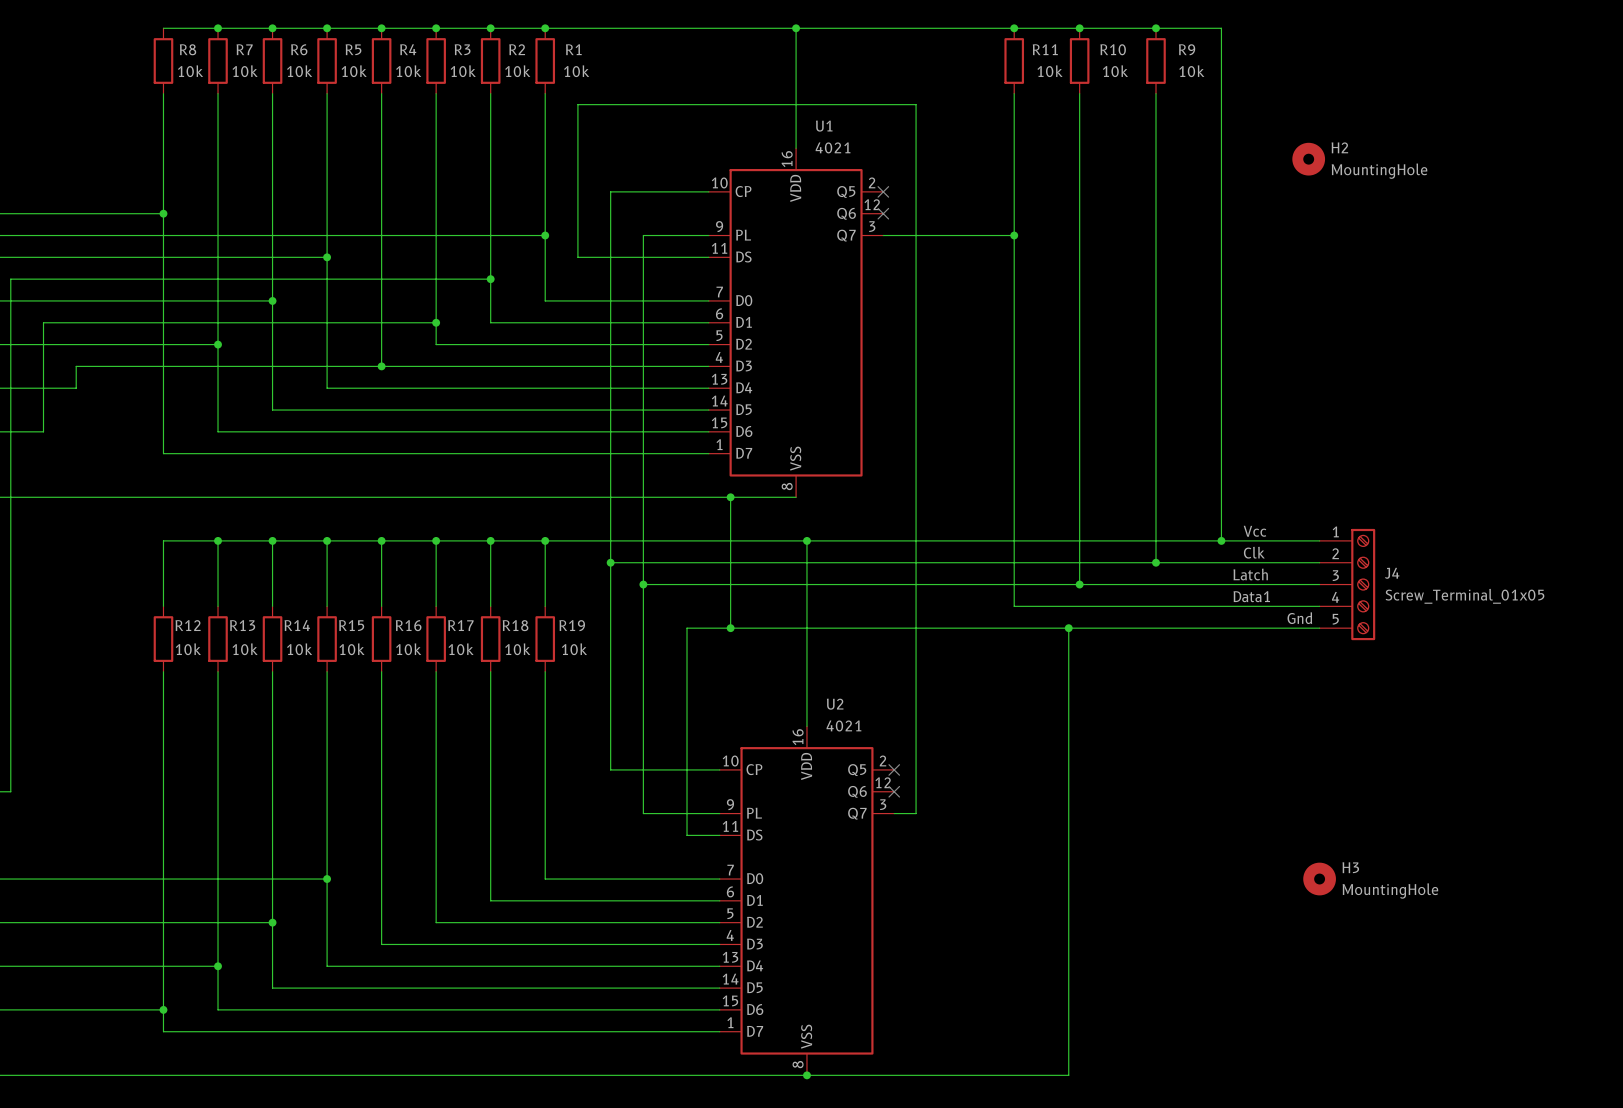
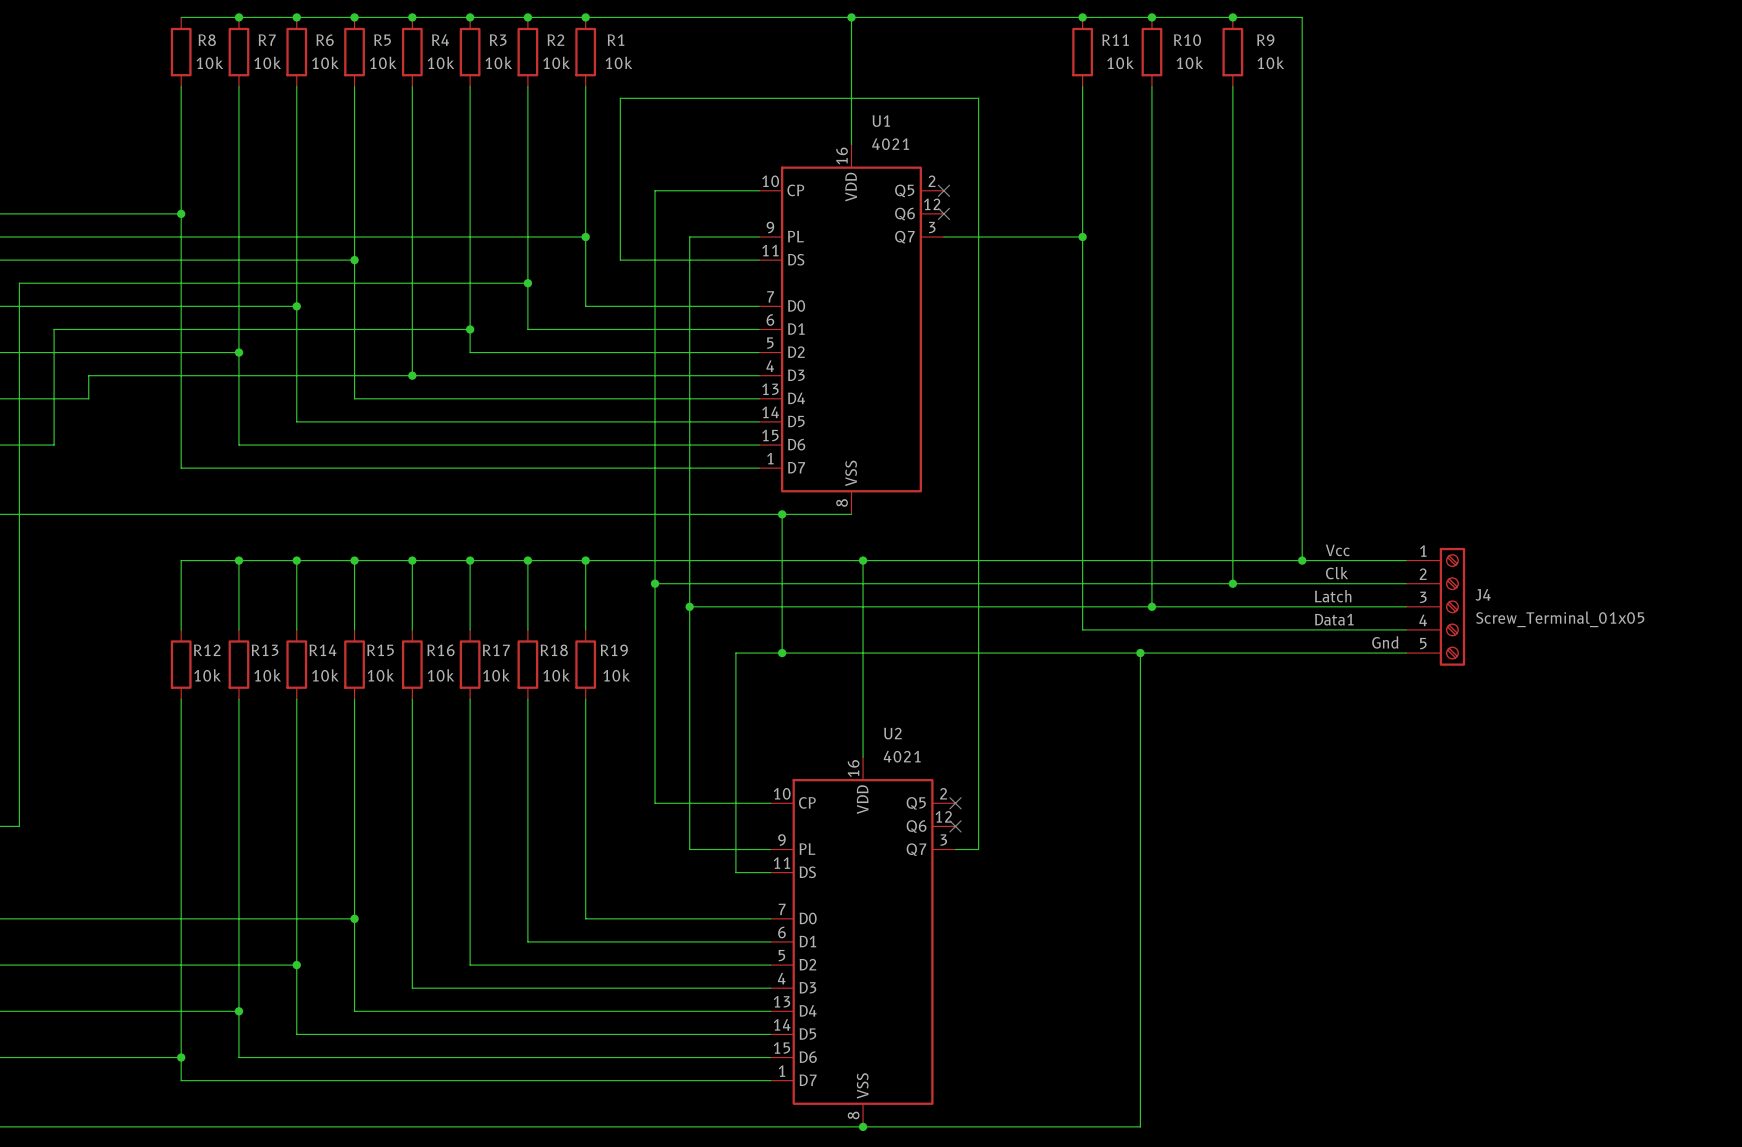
H2: MountingHole (1308, 159) -> none
H3: MountingHole (1319, 879) -> none

